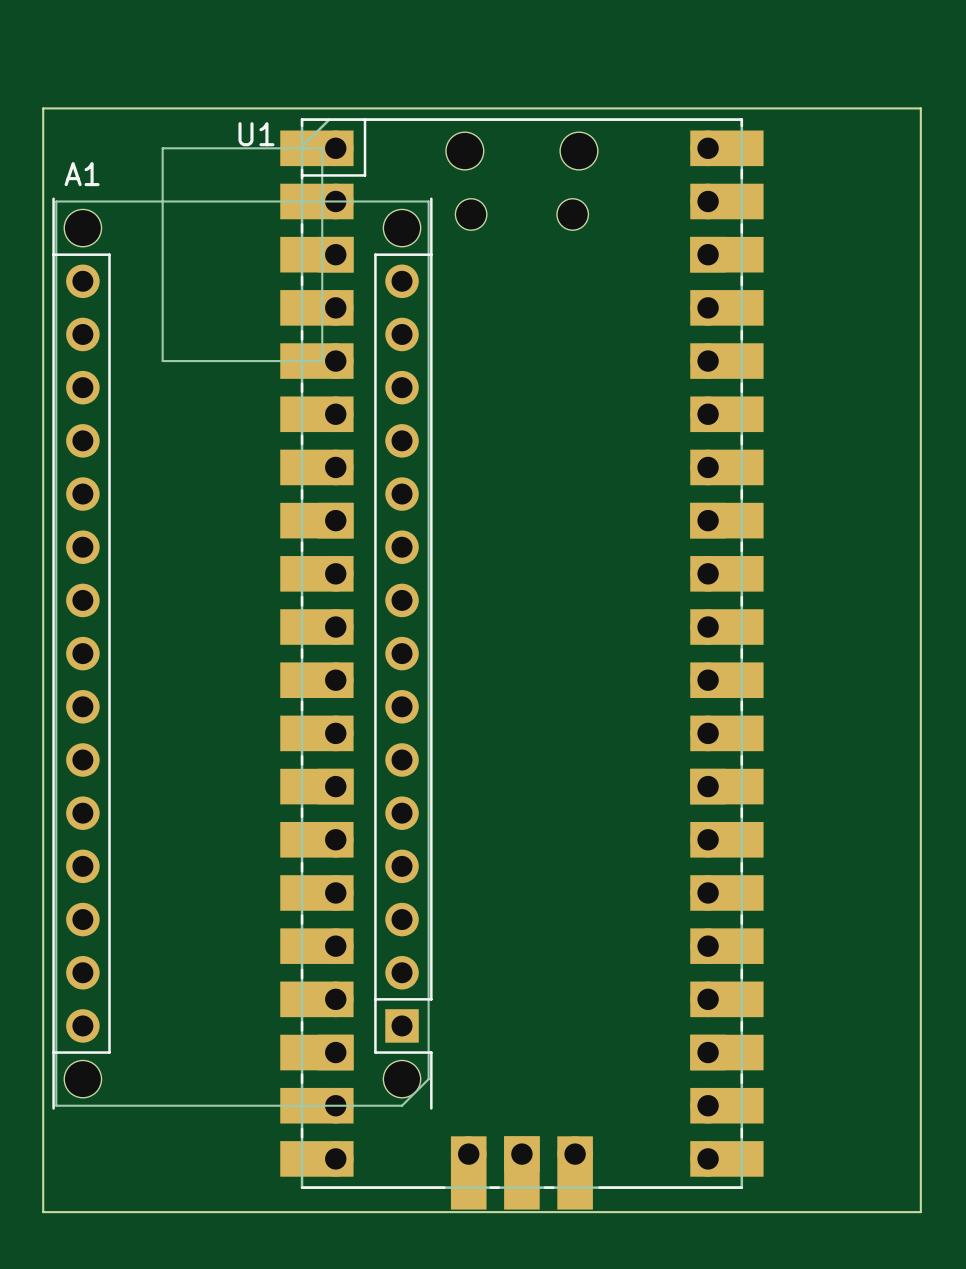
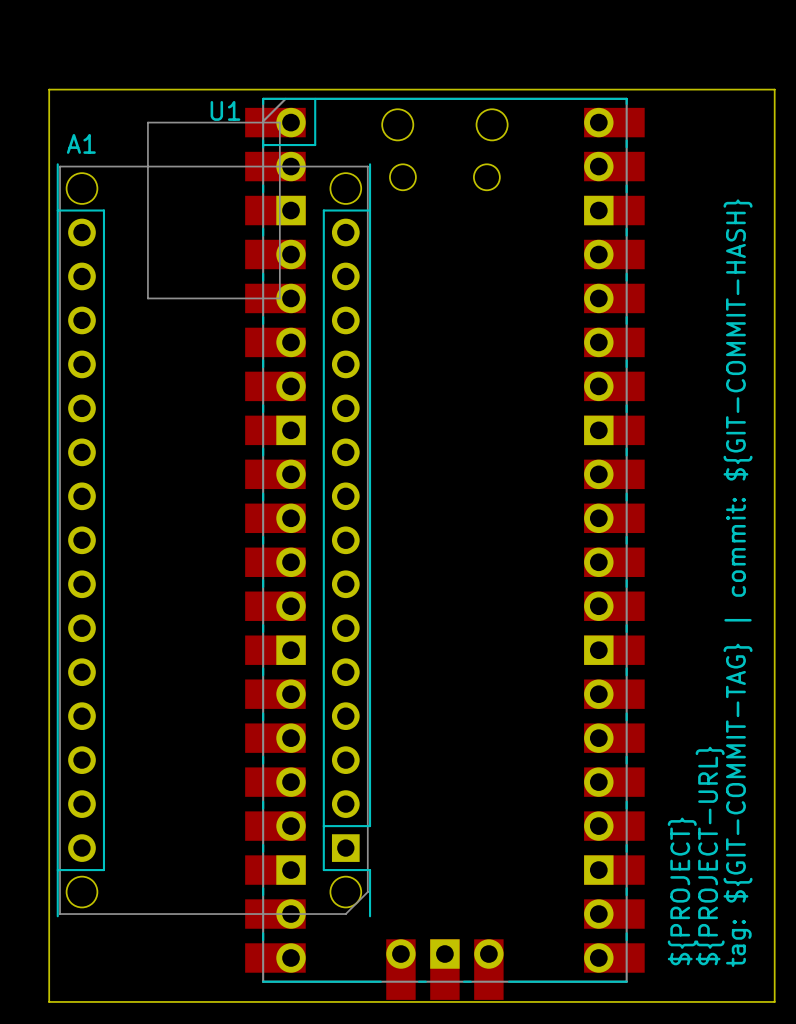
text: none -> tag: ${GIT-COMMIT-TAG} | commit: ${GIT-COMMIT-HASH} (738, 583)
text: none -> ${PROJECT-URL} (710, 856)
text: none -> ${PROJECT} (682, 891)

